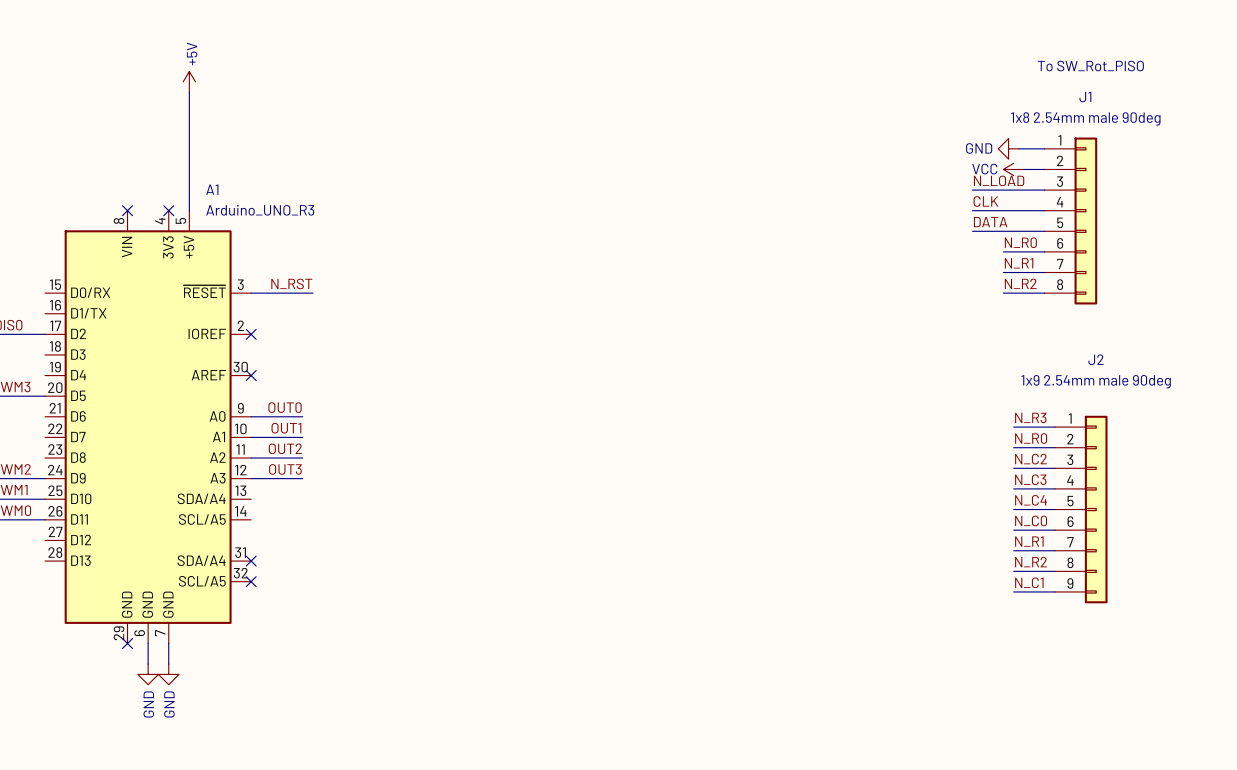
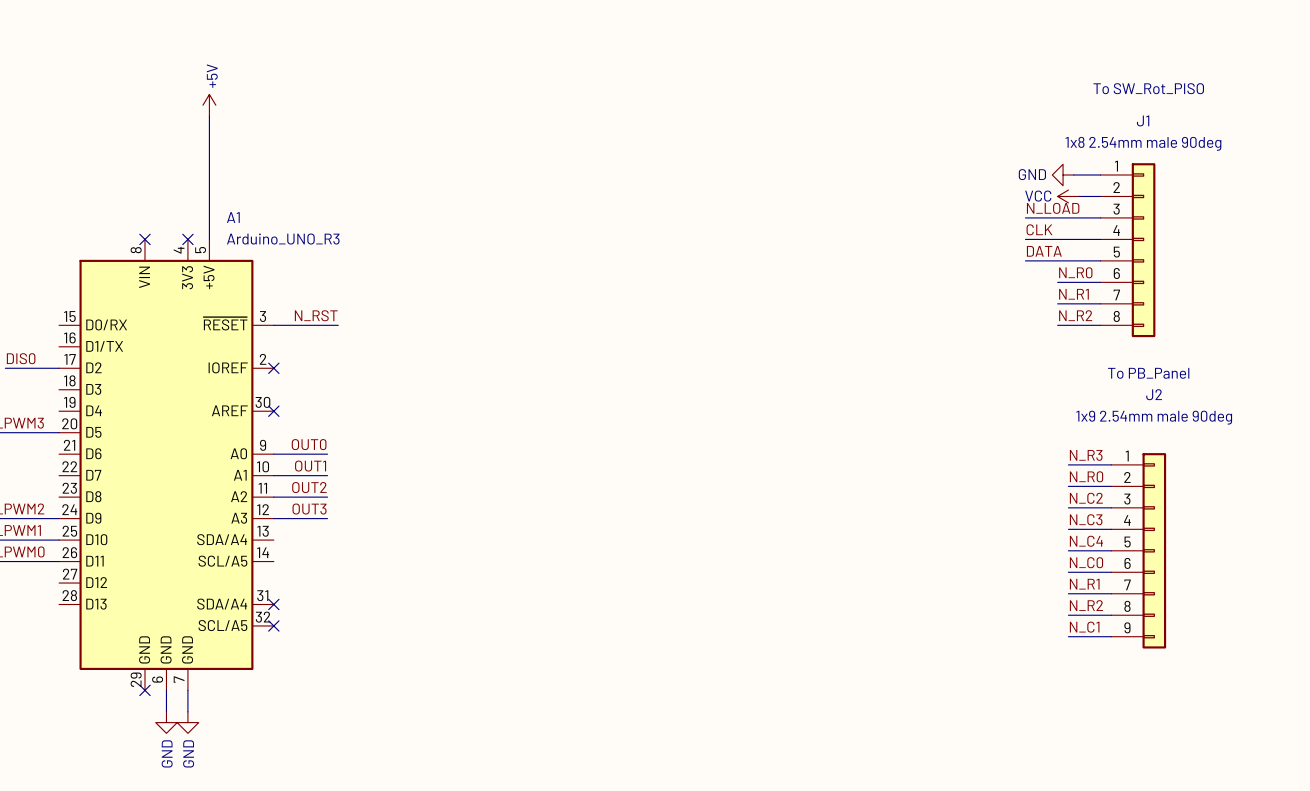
J2 text: none -> To PB_Panel (1148, 373)

